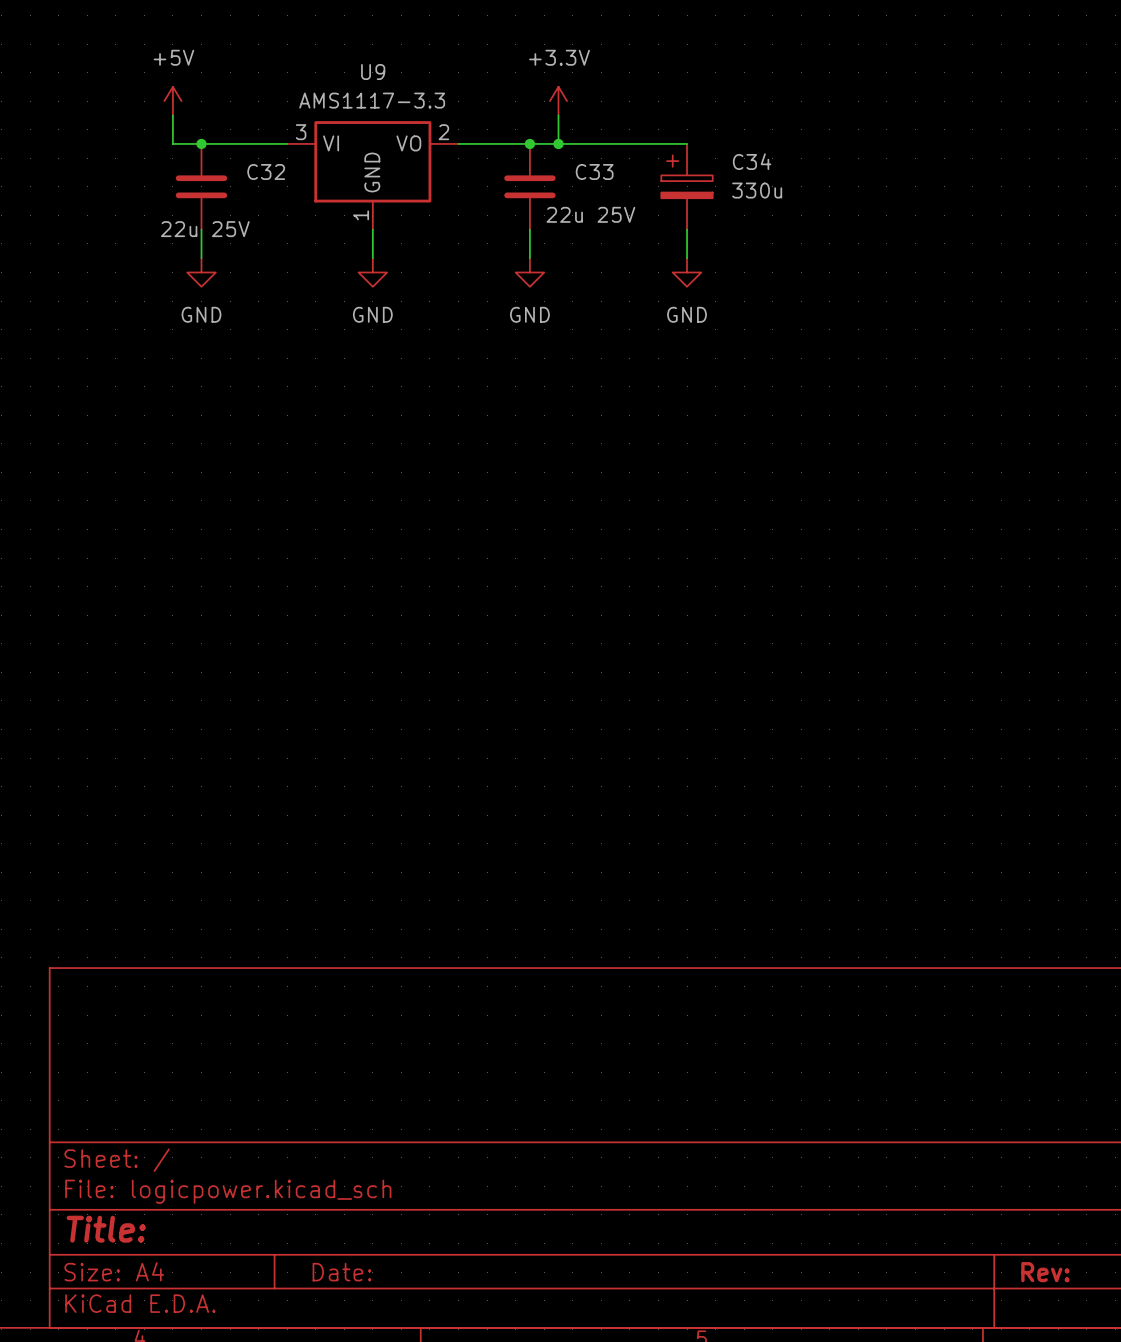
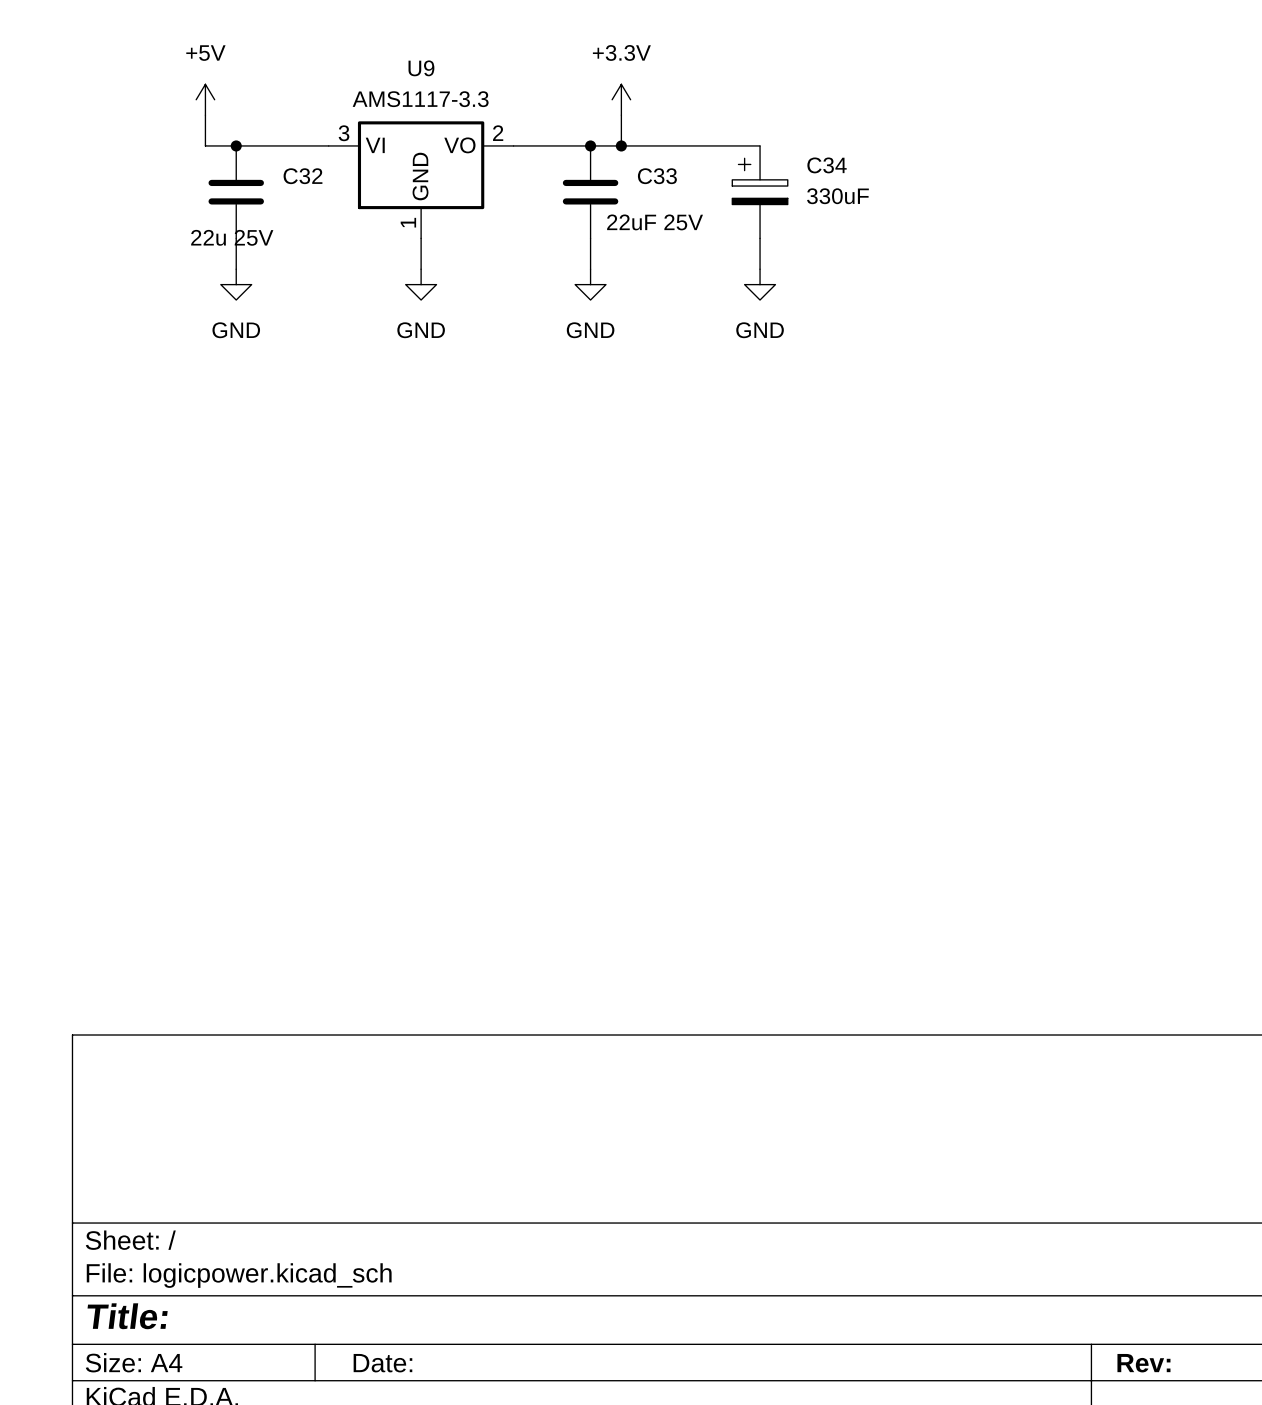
C34 value: 330u (757, 190) -> 330uF (837, 196)
C33 value: 22u 25V (590, 214) -> 22uF 25V (655, 222)

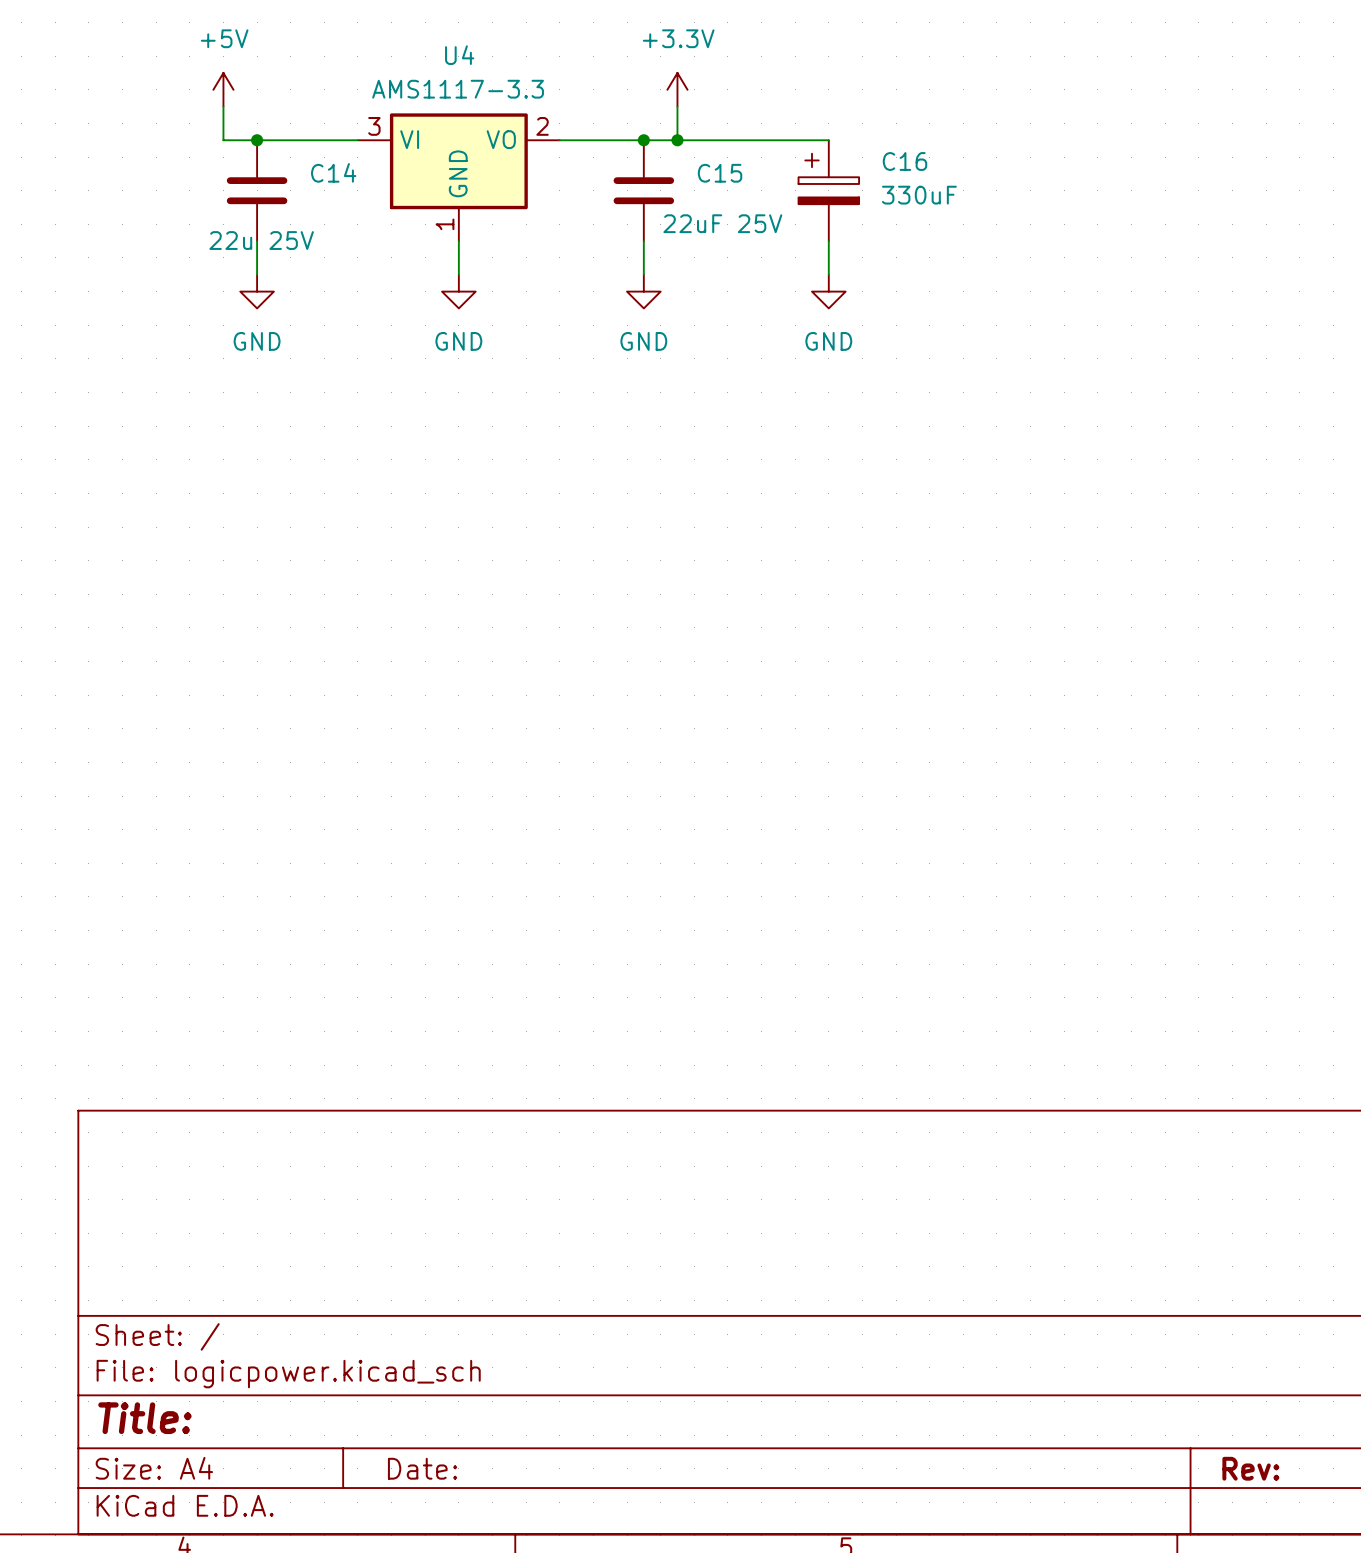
U9 name: U9 (421, 68) -> U4 (459, 55)
C34 name: C34 (827, 165) -> C16 (905, 161)
C32 name: C32 (303, 176) -> C14 (333, 172)
C33 name: C33 (657, 176) -> C15 (720, 173)

